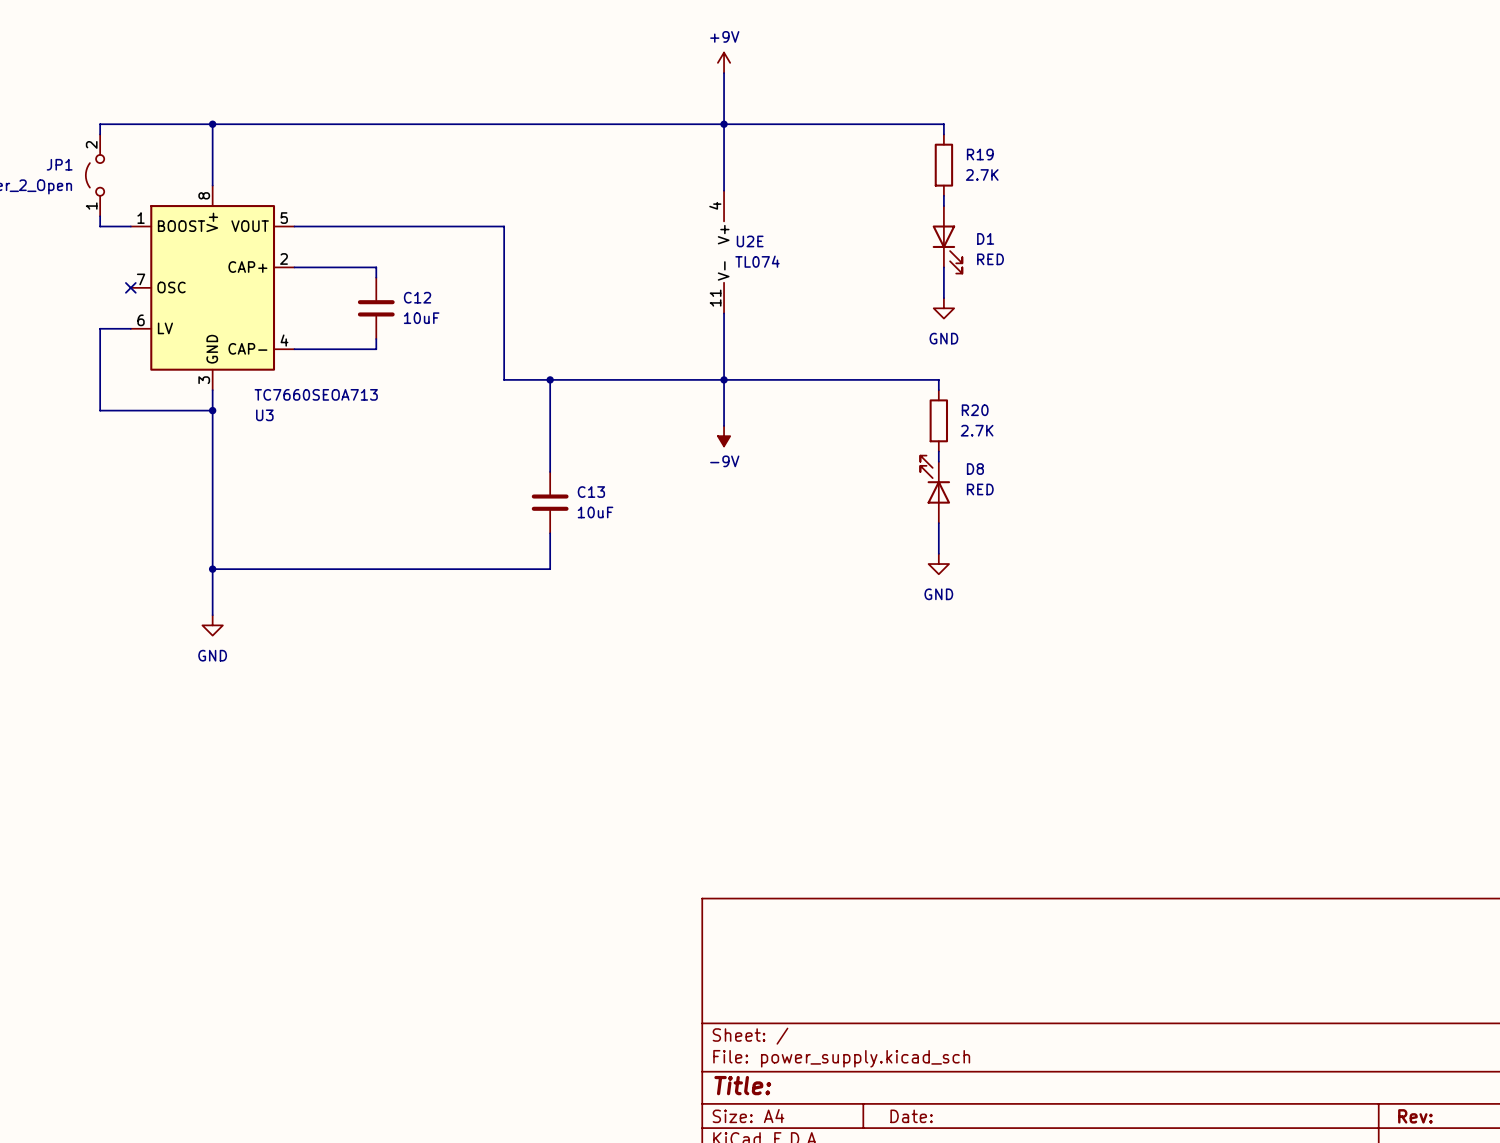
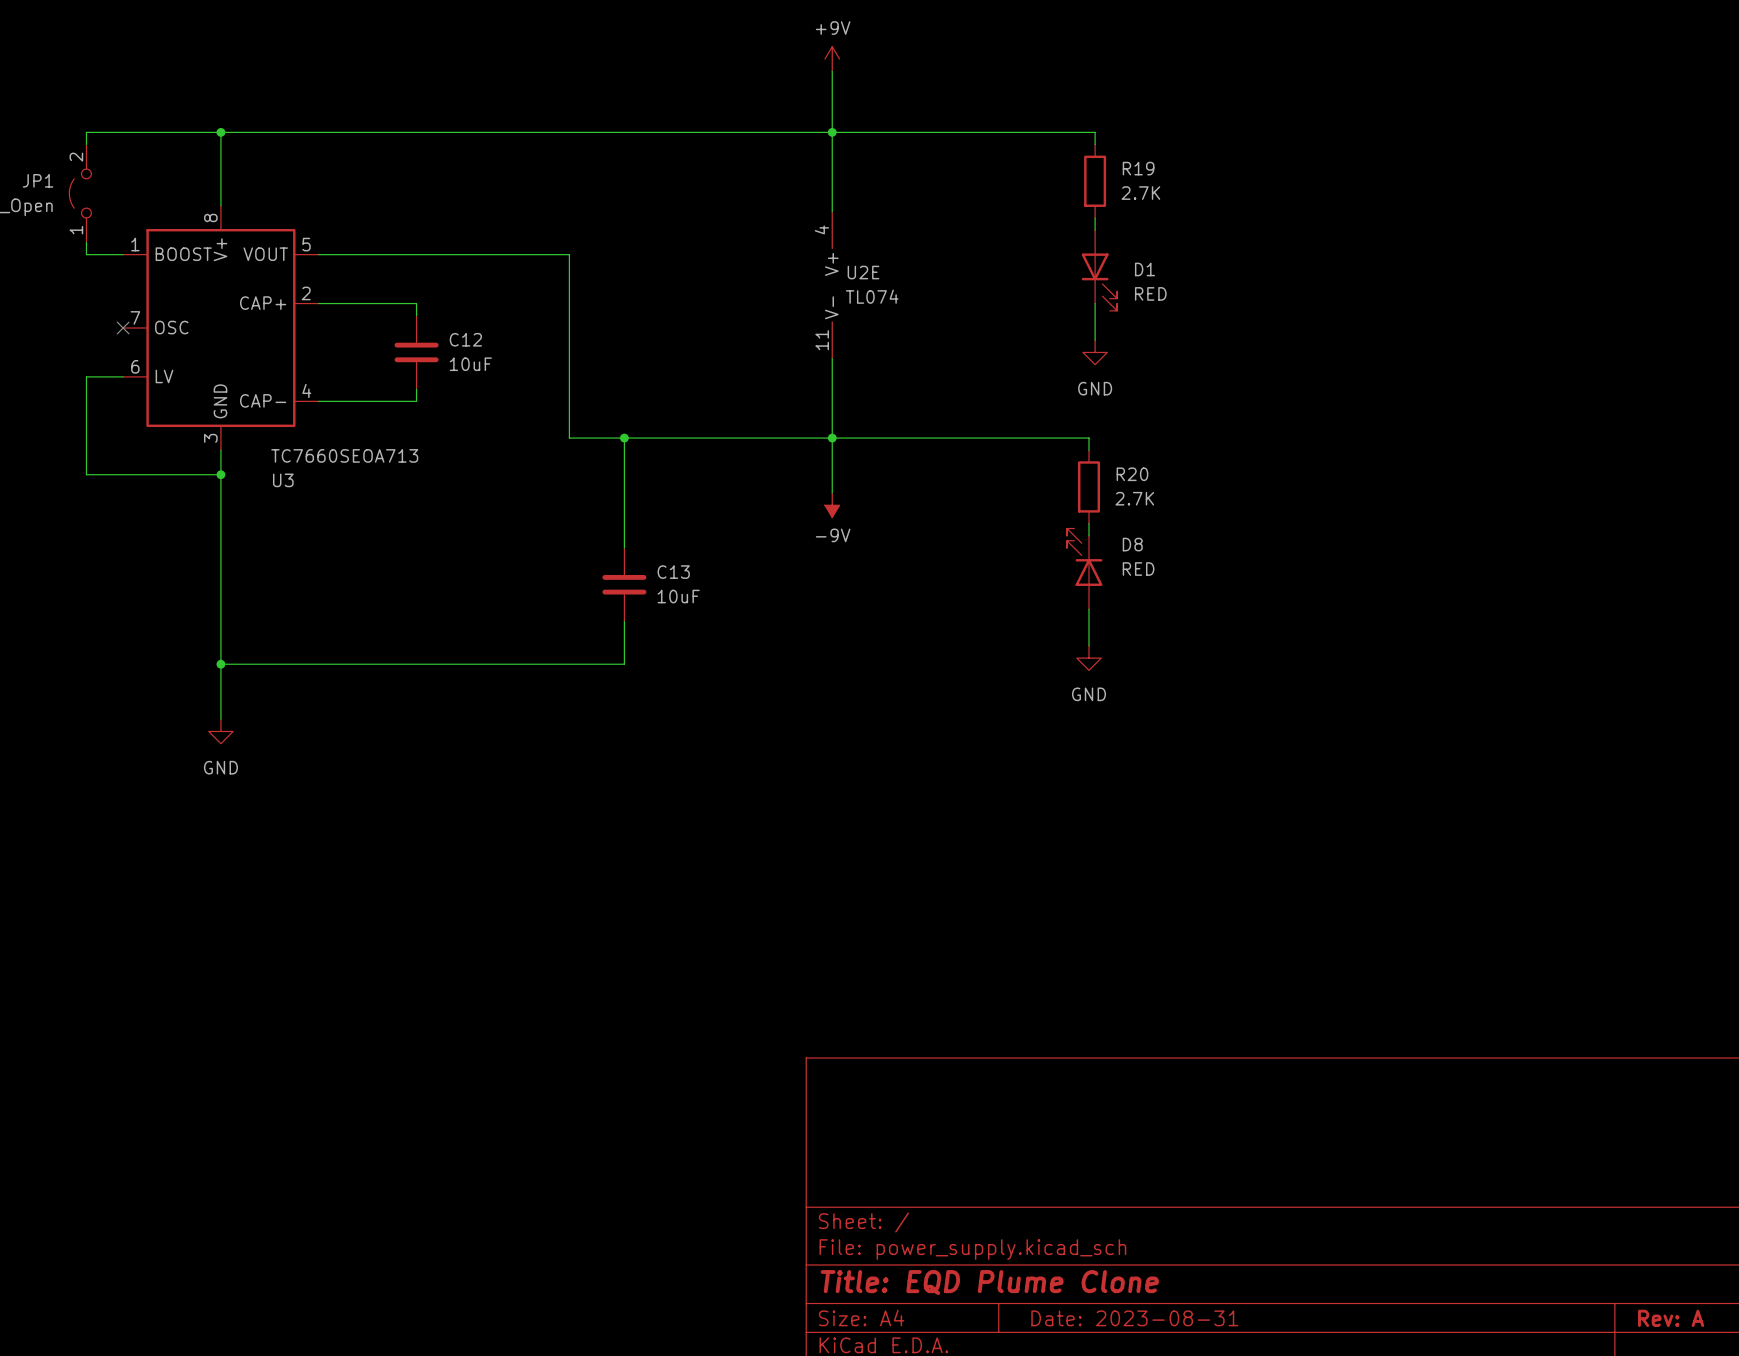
title block: Title: (742, 1085) -> Title: EQD Plume Clone (989, 1282)
title block: Date: (911, 1116) -> Date: 2023-08-31 (1134, 1318)
title block: Rev: (1415, 1116) -> Rev: A (1671, 1318)

